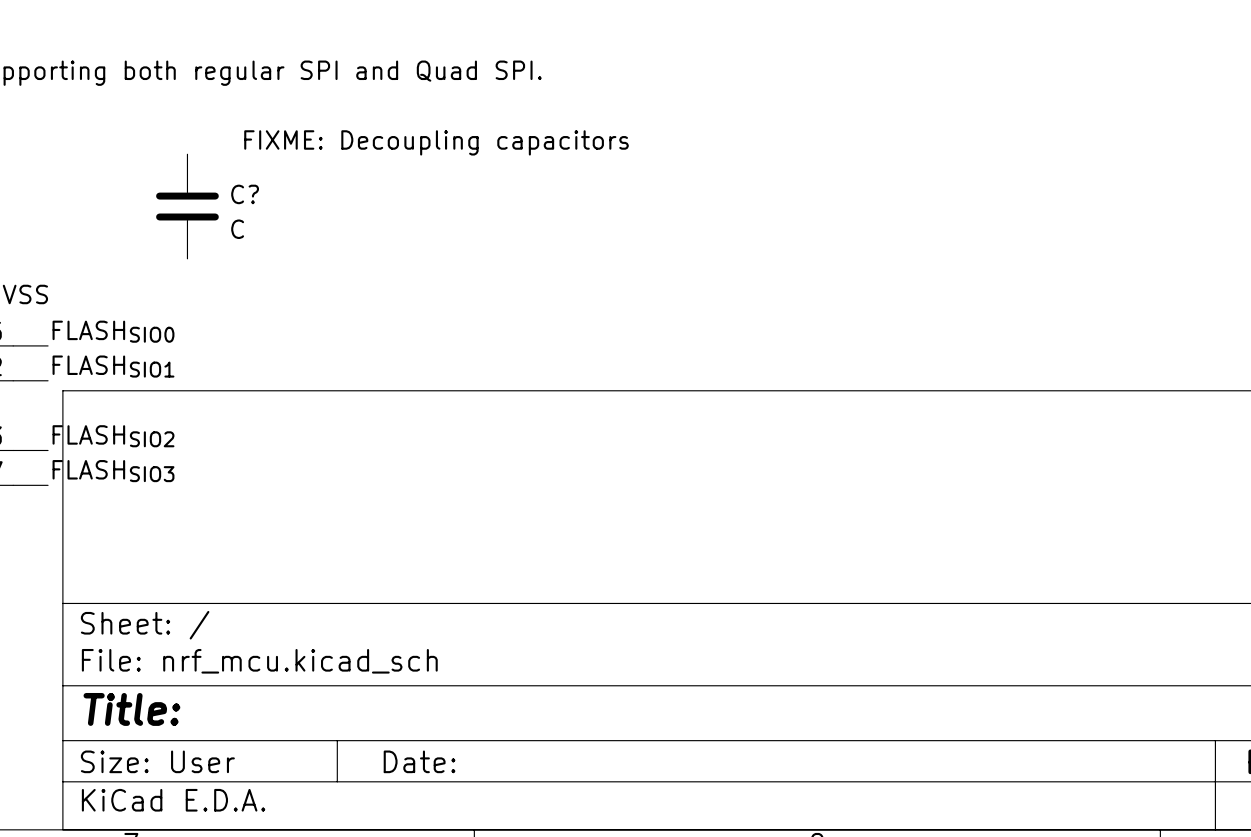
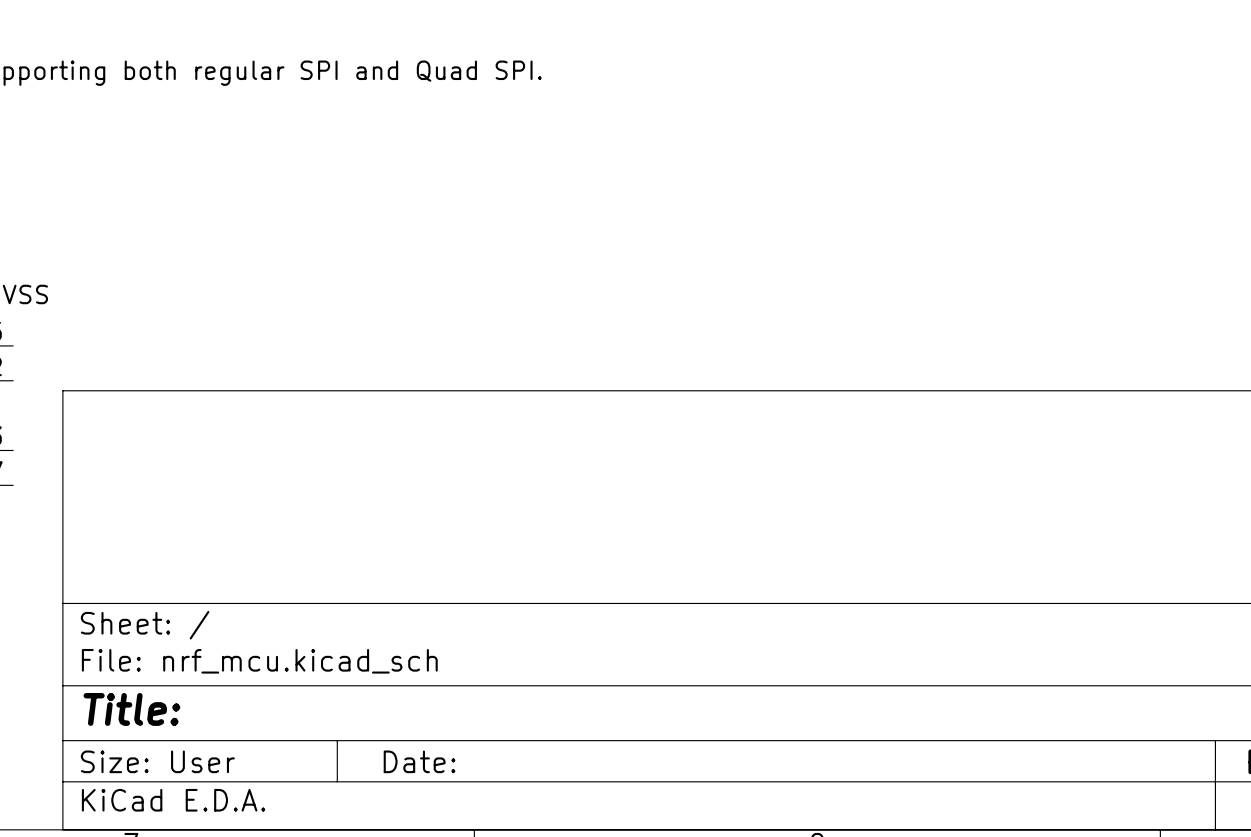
text: FIXME: Decoupling capacitors (436, 142) -> none
C?: C (187, 206) -> none
label: FLASHSIO0 (113, 331) -> none
wire: (13, 345) (48, 345) -> none
label: FLASHSIO1 (113, 366) -> none
wire: (13, 380) (48, 380) -> none
label: FLASHSIO2 (113, 436) -> none
wire: (13, 450) (48, 450) -> none
label: FLASHSIO3 (113, 471) -> none
wire: (13, 485) (48, 485) -> none

